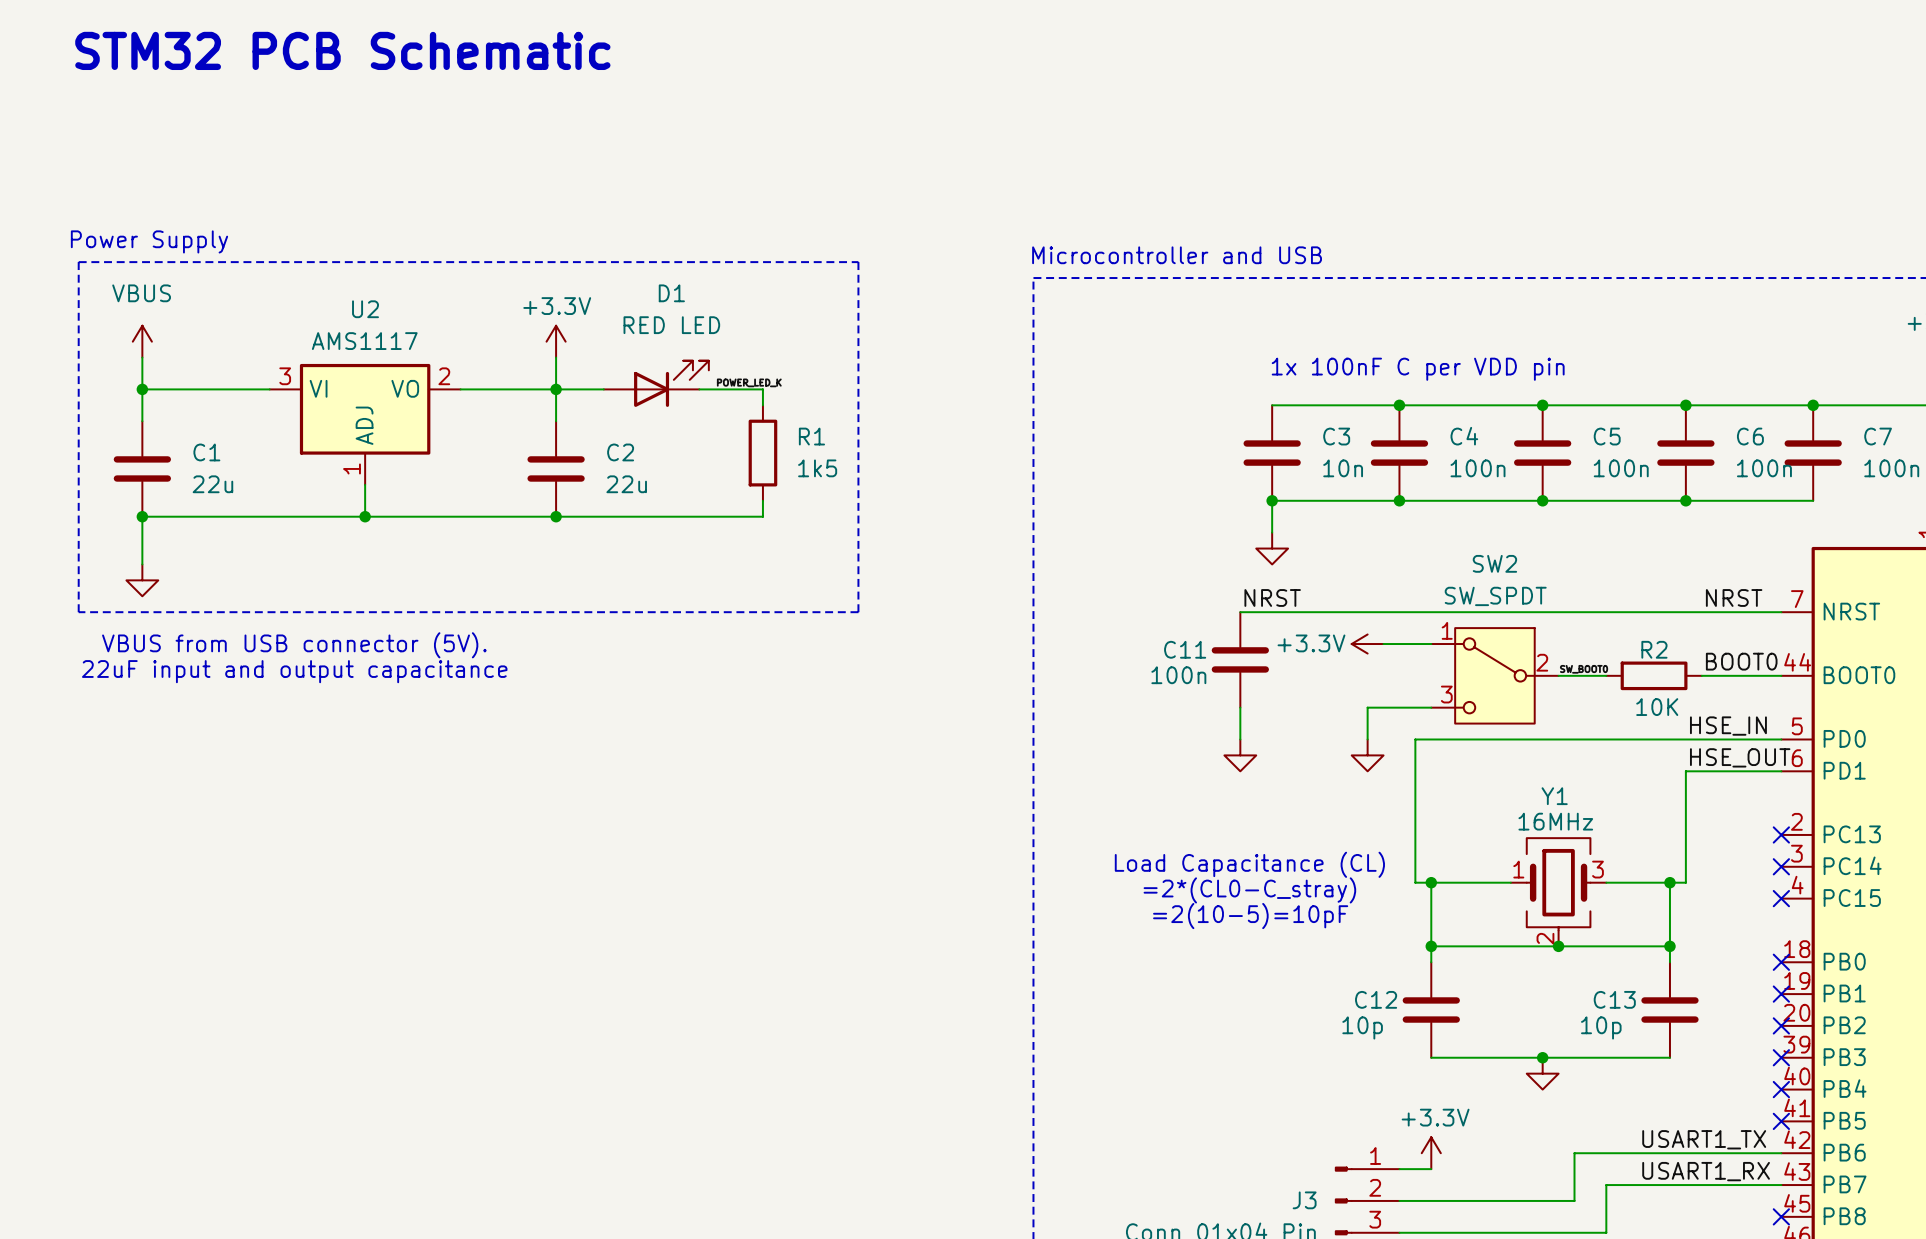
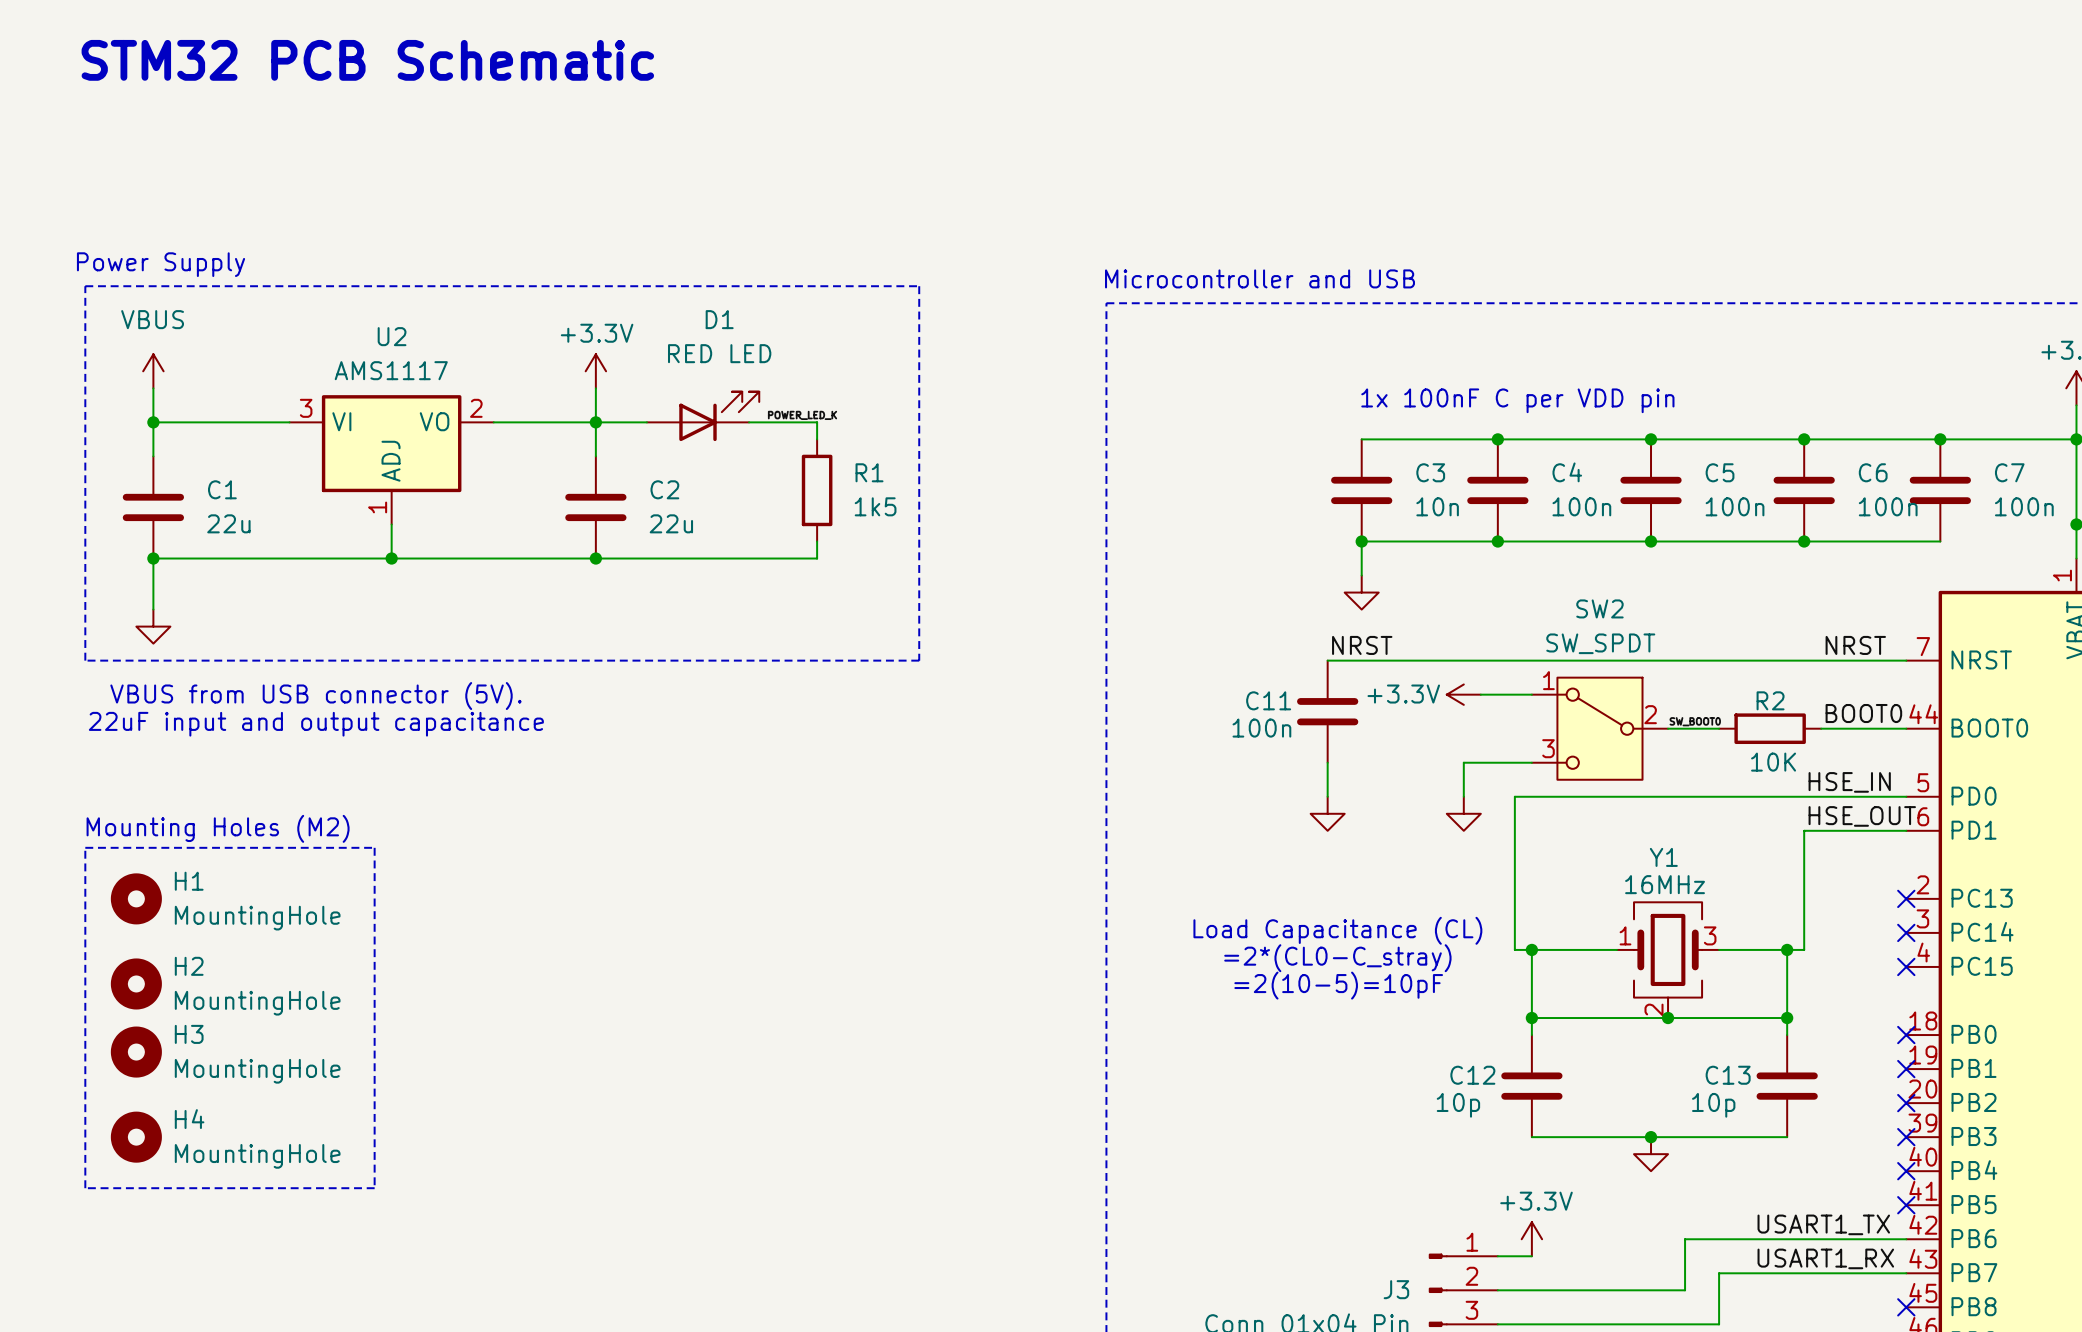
text: none -> Mounting Holes (M2) (218, 828)
line: none -> (85, 847) (374, 847) (374, 1188) (85, 1188) (85, 847)
H1: none -> MountingHole (136, 898)
H2: none -> MountingHole (136, 983)
H3: none -> MountingHole (136, 1052)
H4: none -> MountingHole (136, 1137)

